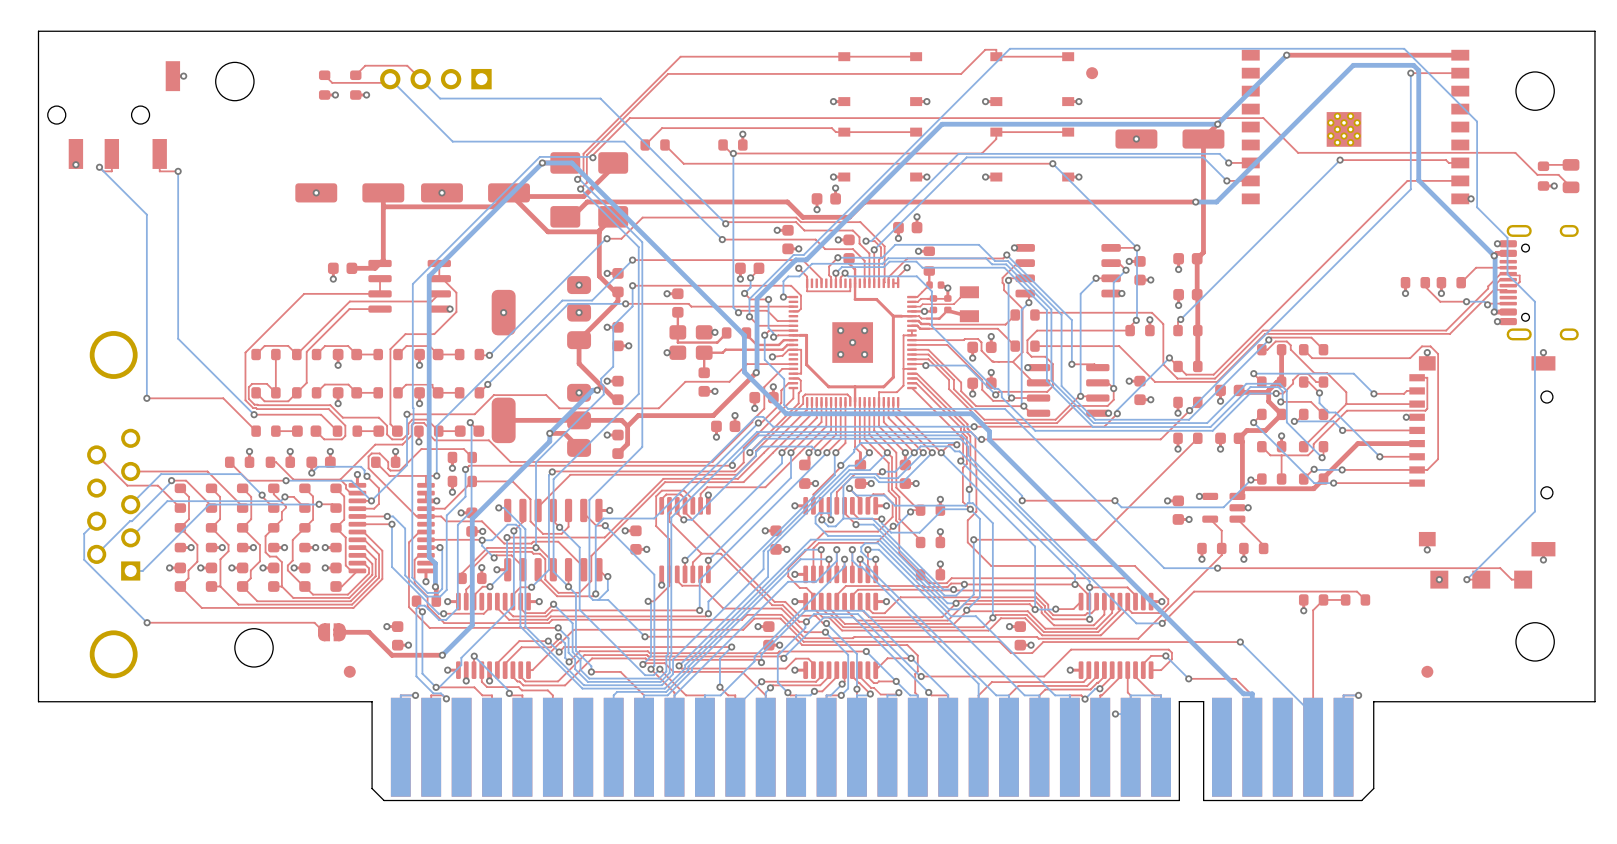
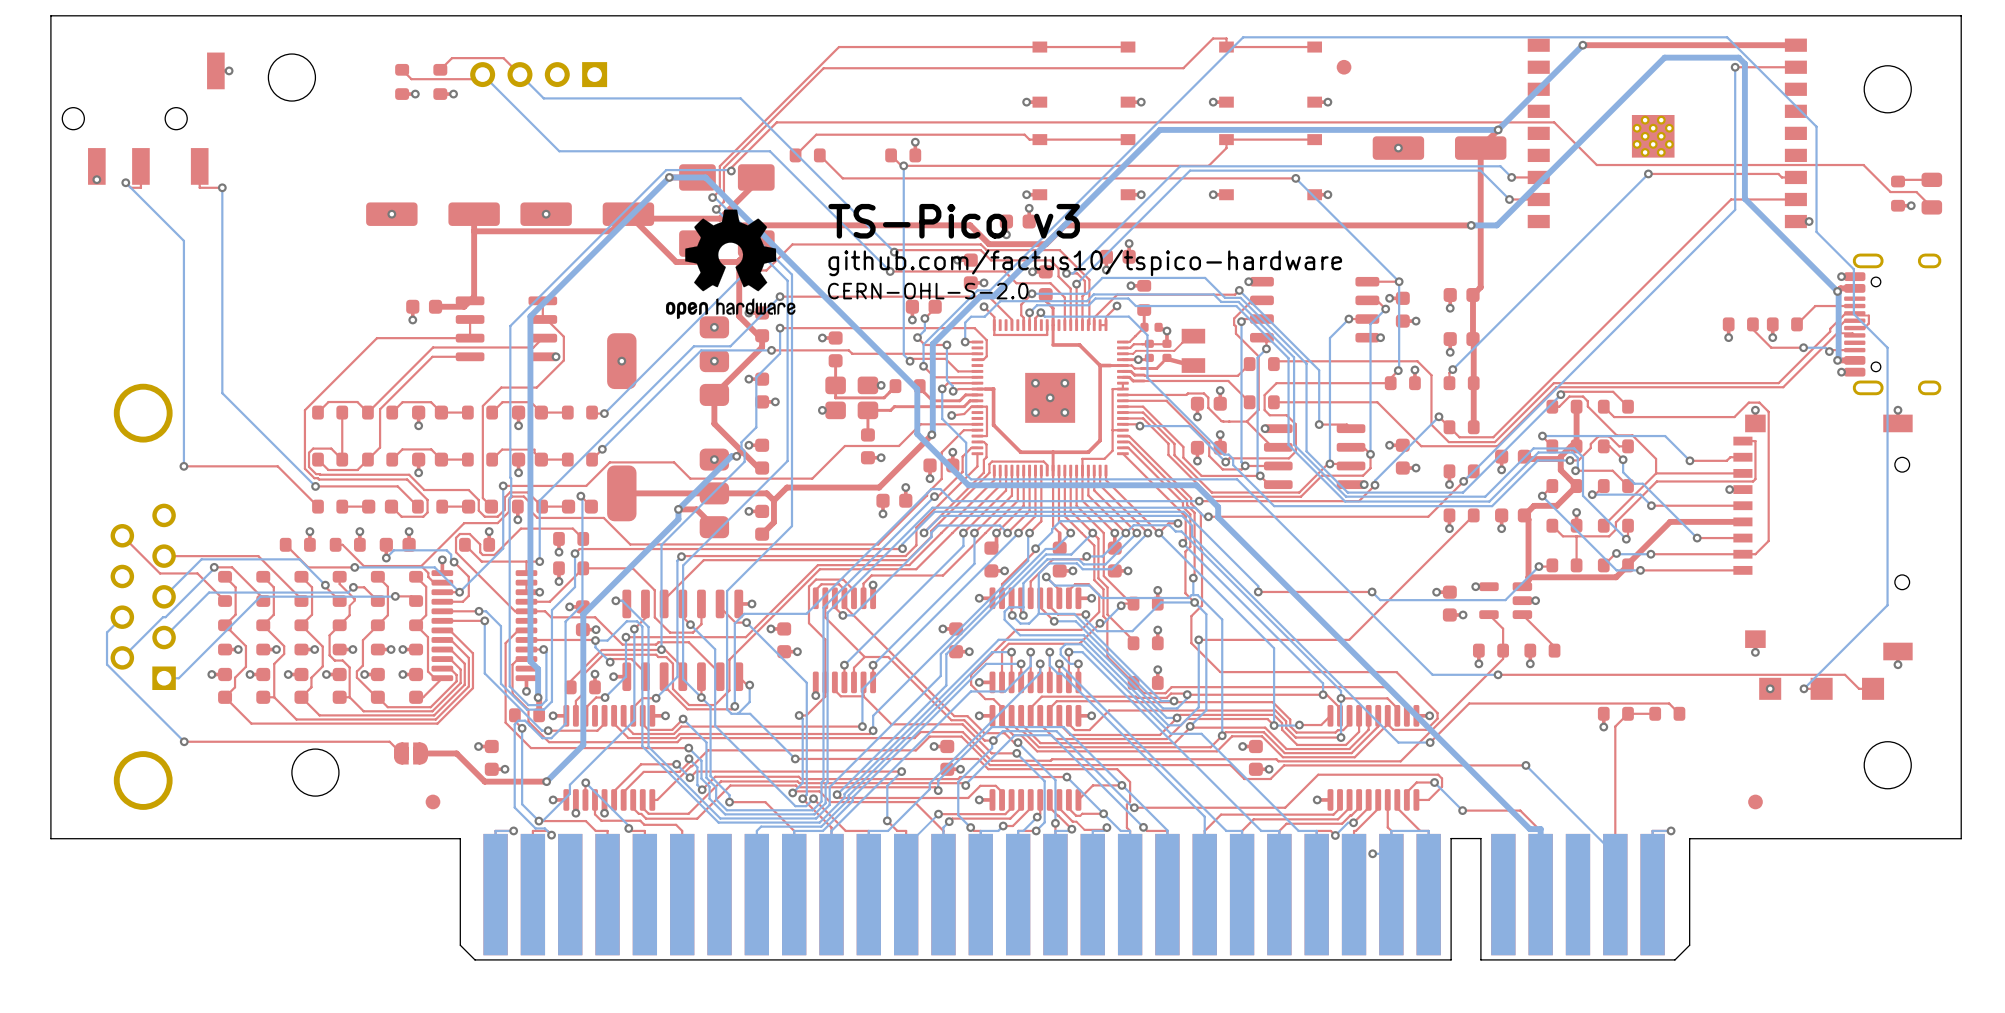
drawing: none -> [665, 209, 796, 320]
text: none -> TS-Pico v3 (954, 221)
text: none -> github.com/factus10/tspico-hardware (1085, 262)
text: none -> CERN-OHL-S-2.0 (928, 291)

